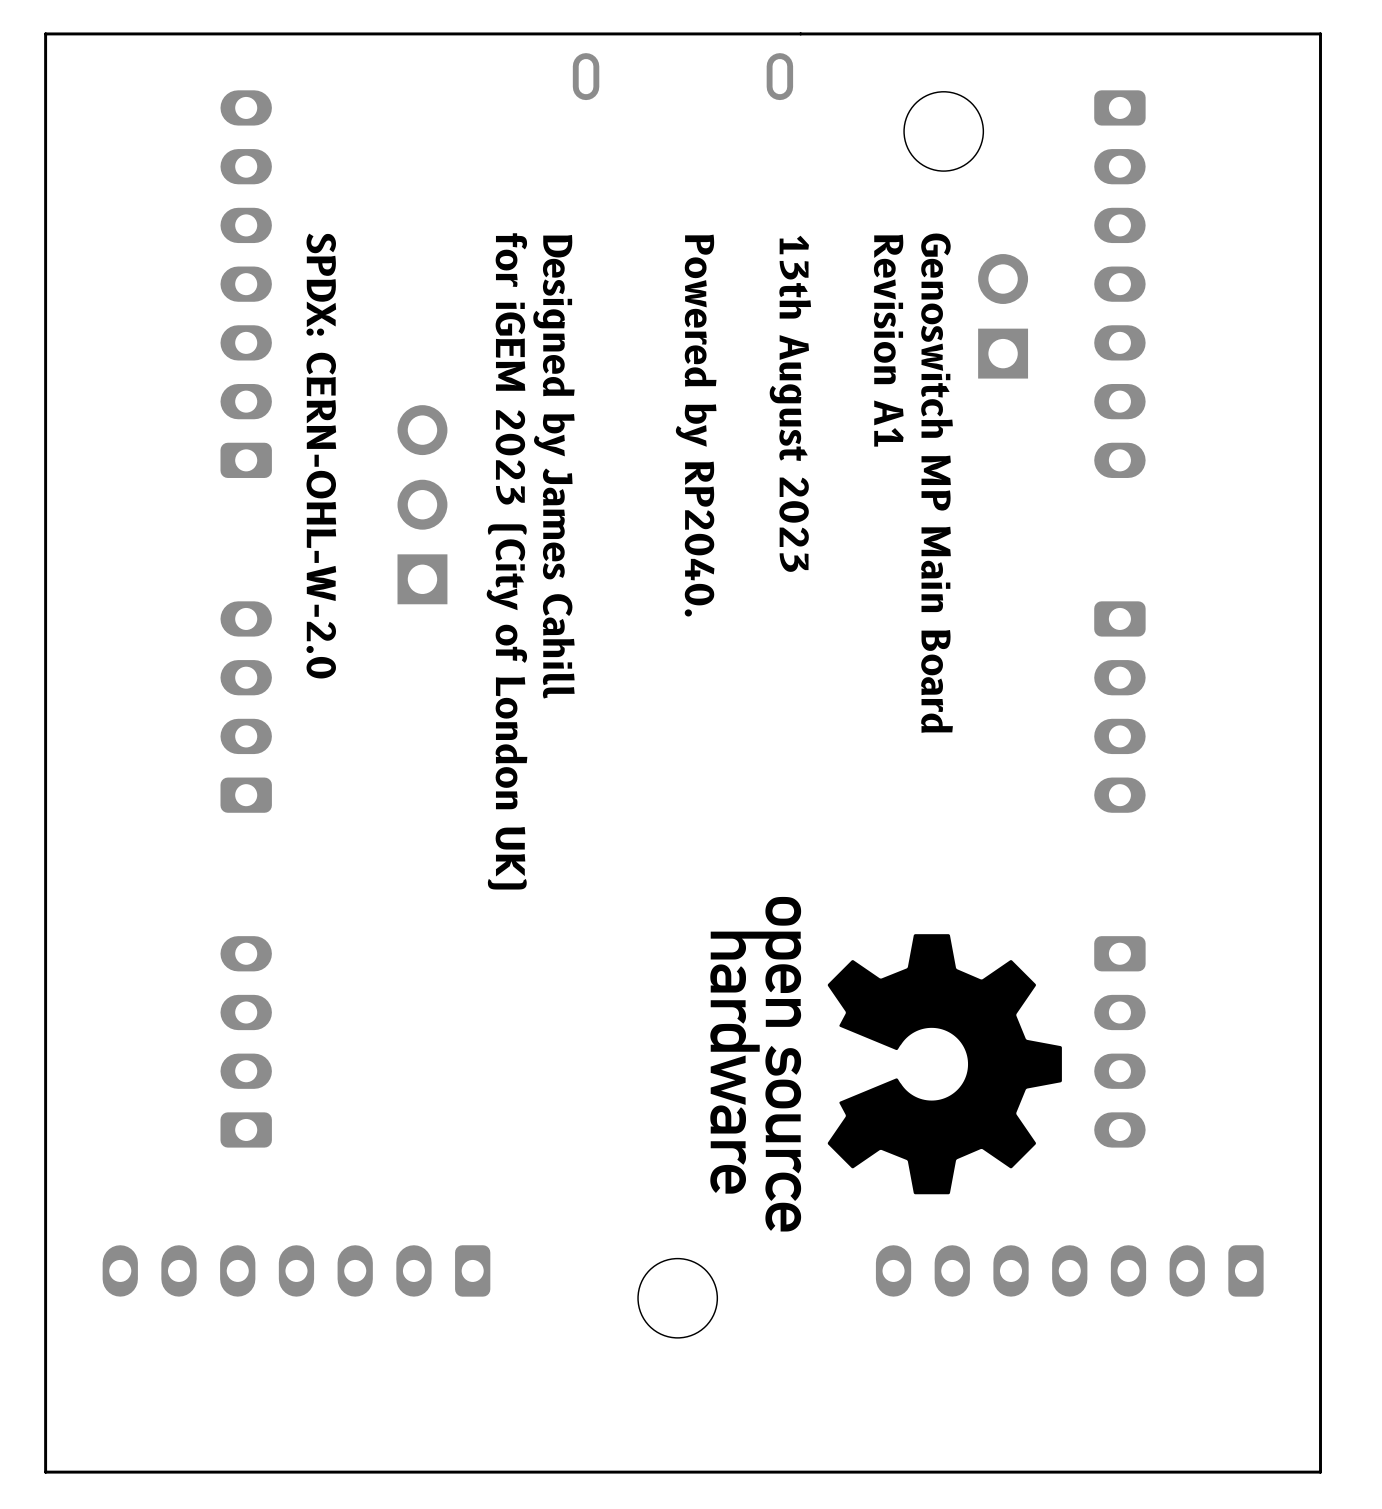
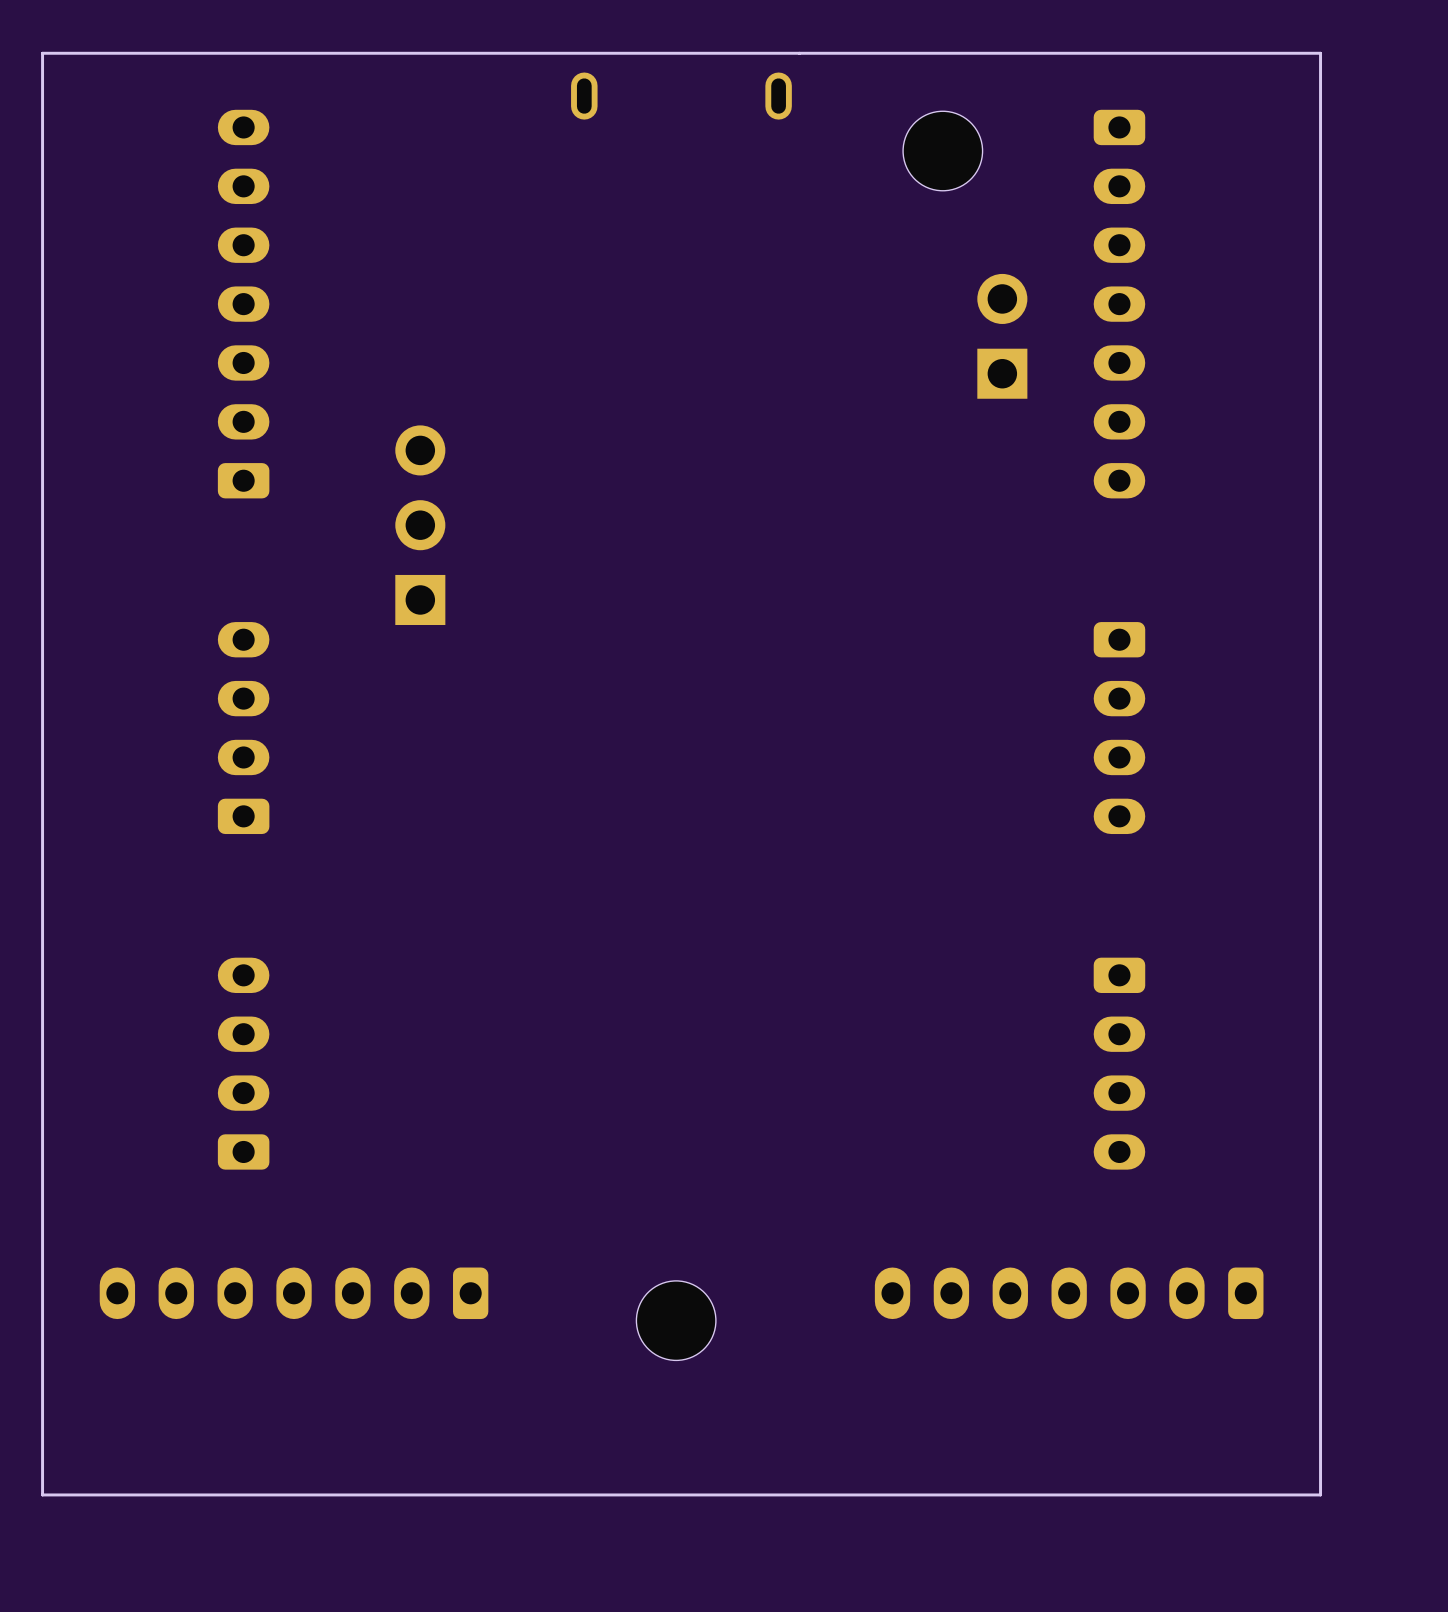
text: Revision A1 (888, 340) -> none
text: 13th August 2023 (790, 403) -> none
text: Powered by RP2040. (696, 425) -> none
text: SPDX: CERN-OHL-W-2.0 (321, 456) -> none
text: Designed by James Cahill (553, 466) -> none
text: Genoswitch MP Main Board (937, 483) -> none
text: for iGEM 2023 (City of London UK) (507, 561) -> none
drawing: [710, 896, 1062, 1232] -> none

